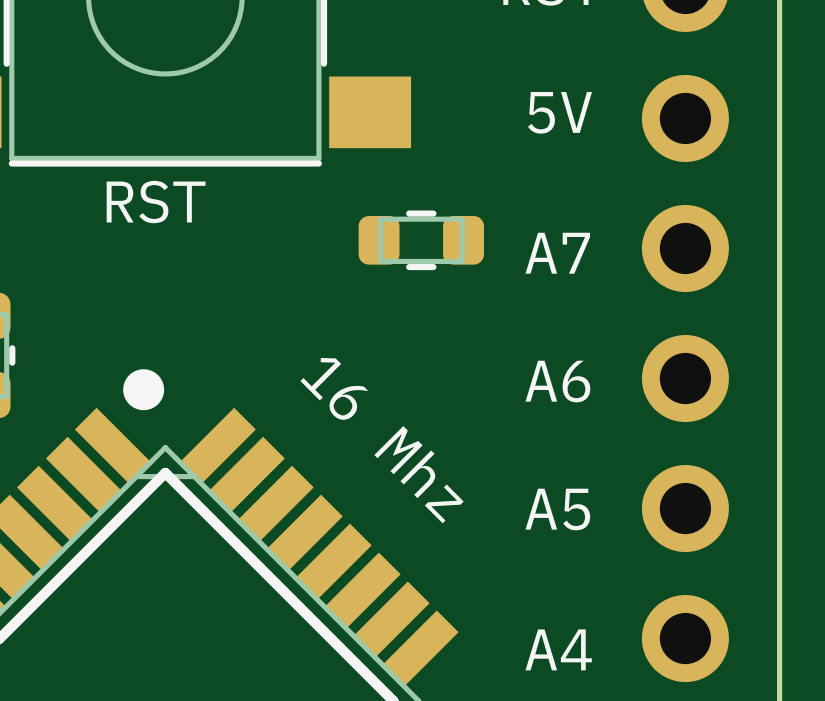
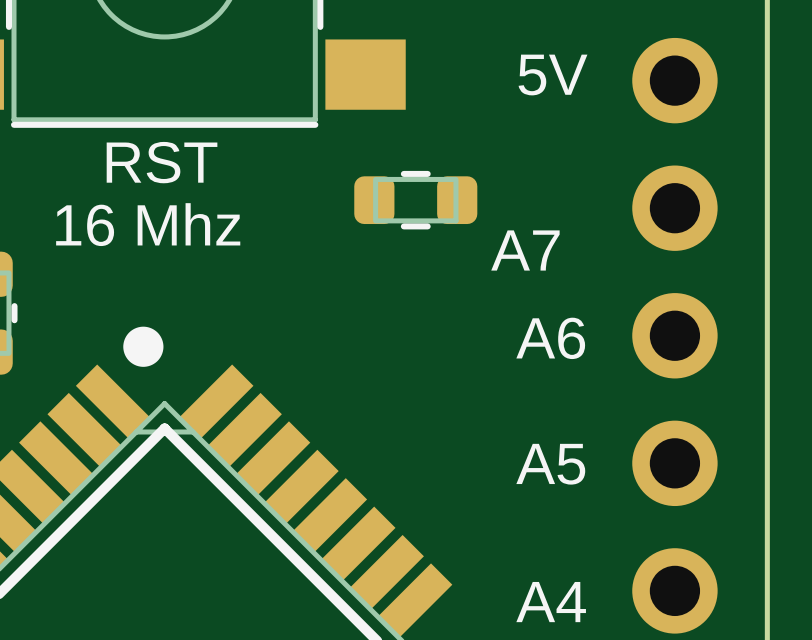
text position: A7 (557, 253) -> A7 (525, 250)
text rotation: 0° (382, 440) -> 45° counterclockwise (148, 224)
text position: 16 Mhz (382, 440) -> 16 Mhz (148, 224)

